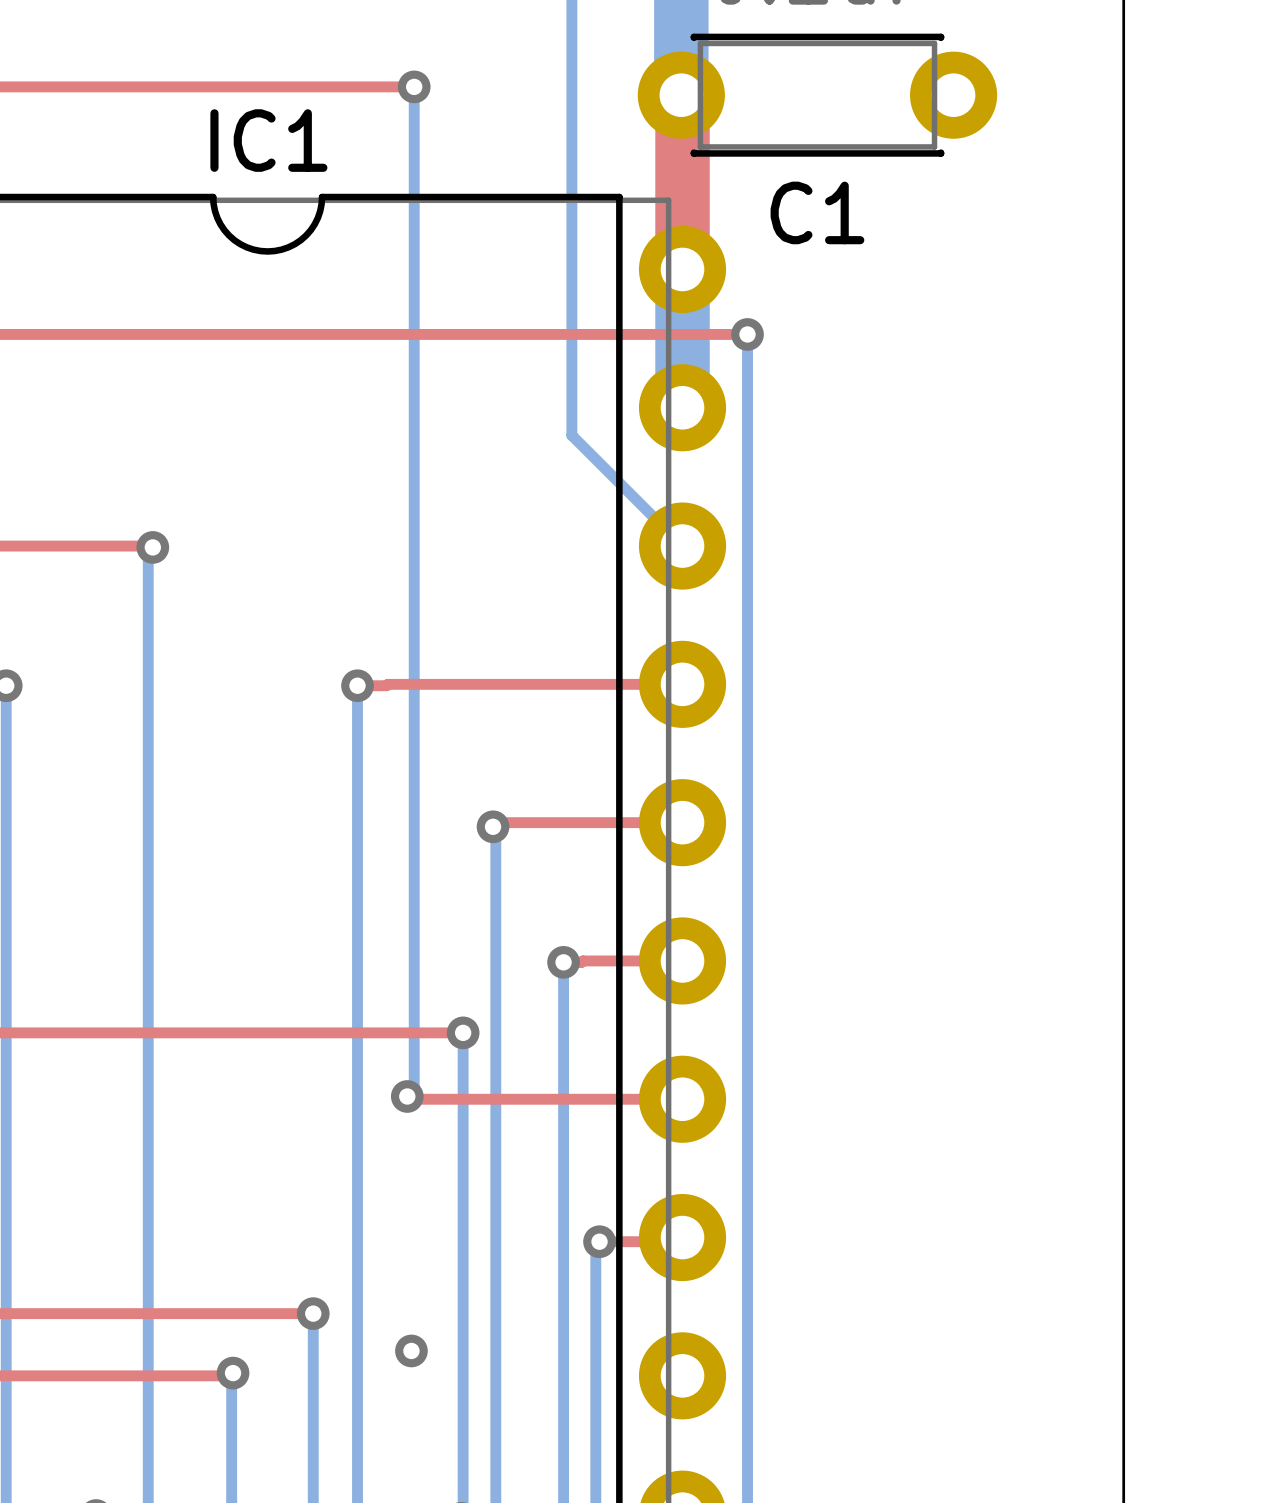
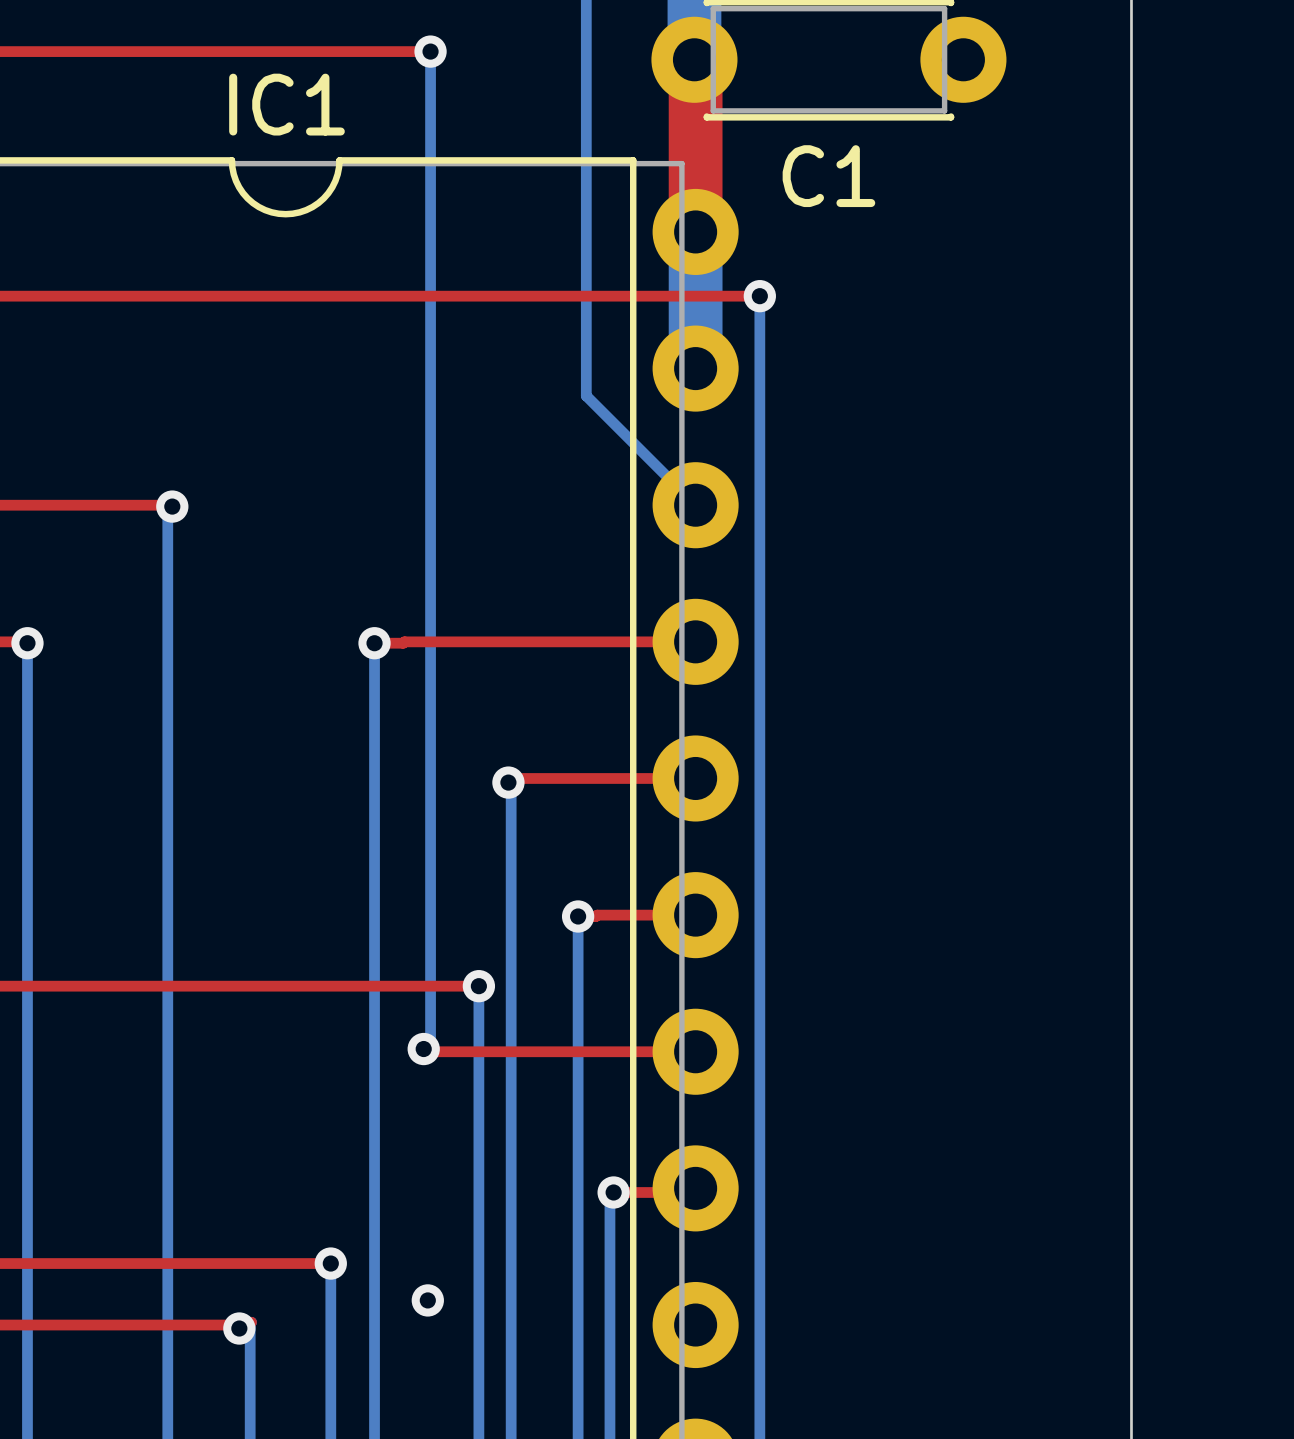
via position: (233, 1373) -> (239, 1328)

